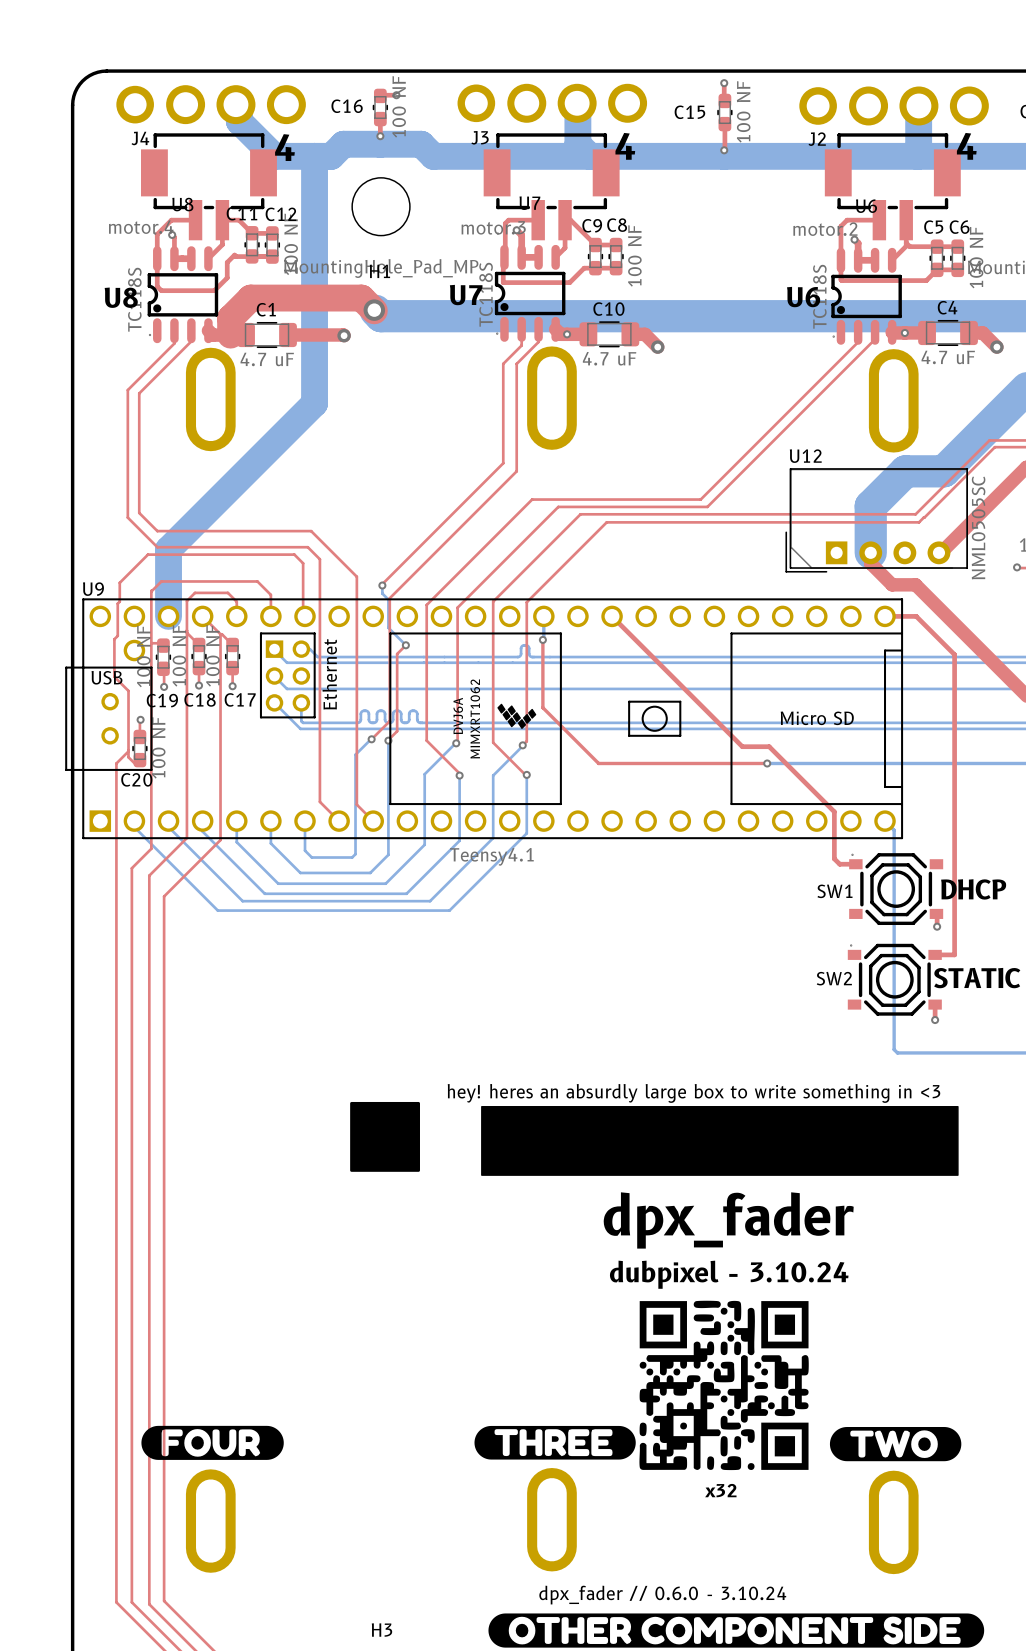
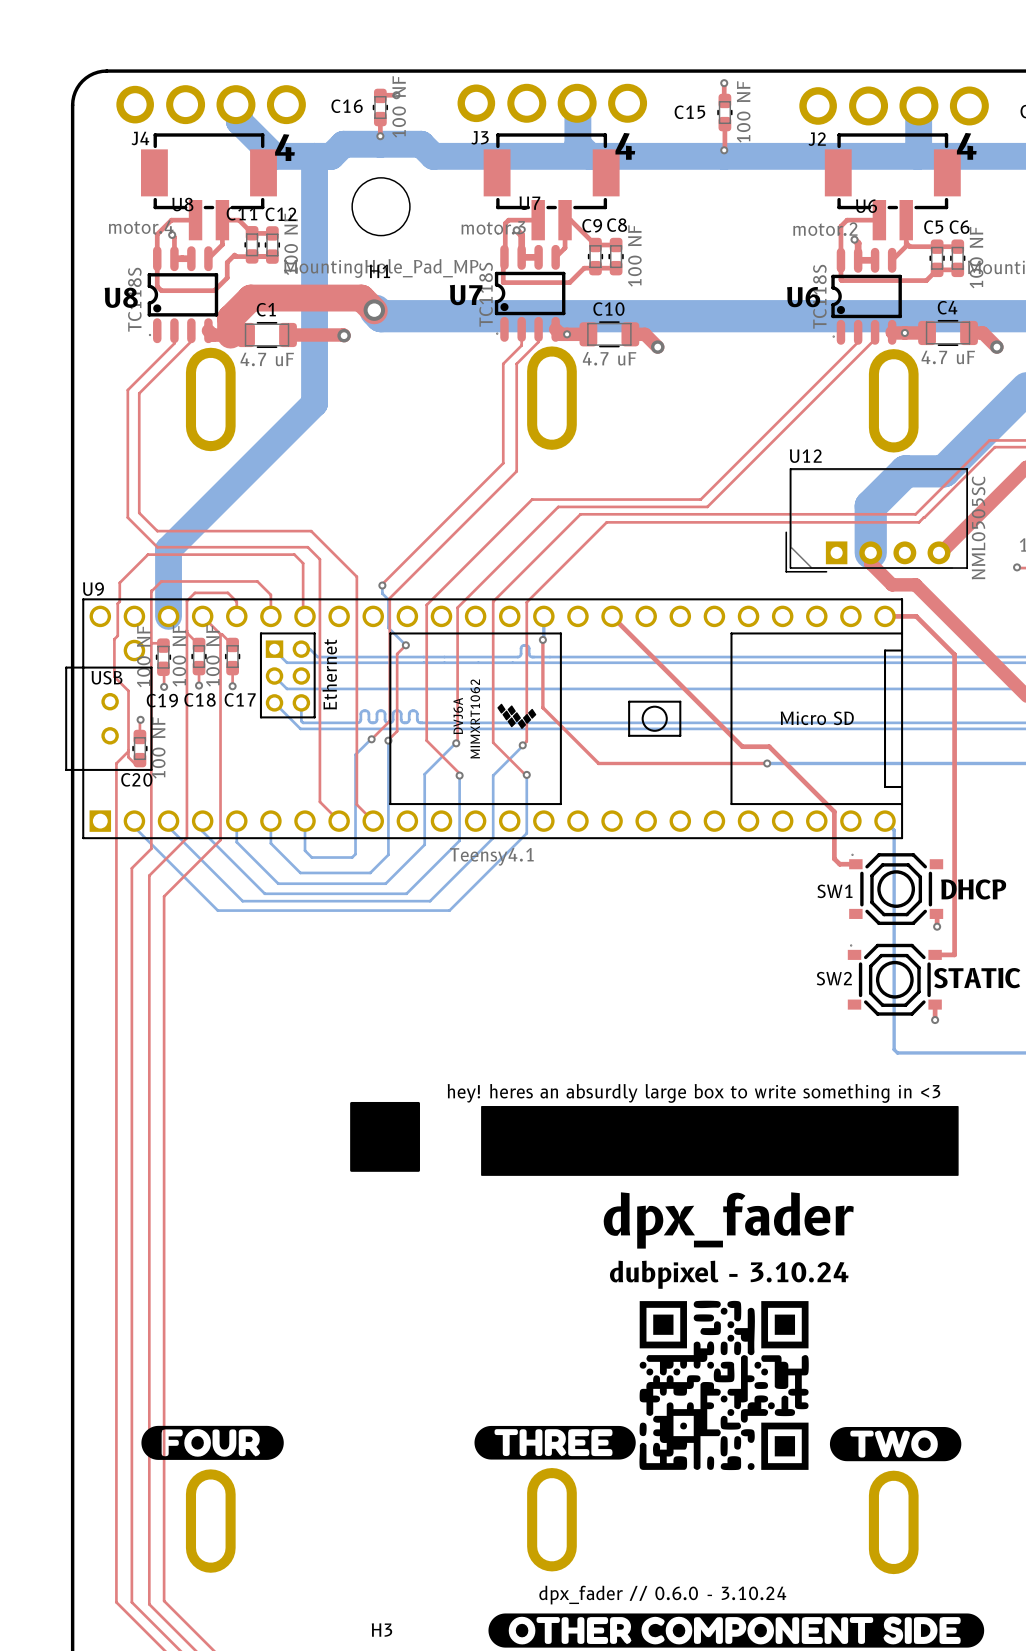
text: x32 (720, 1490) -> none

